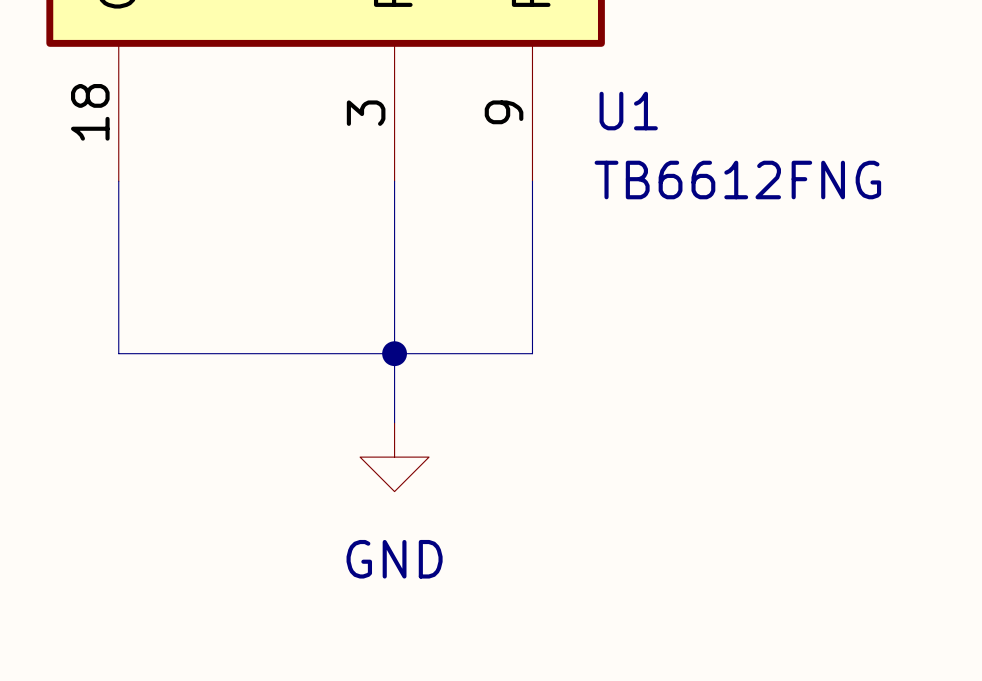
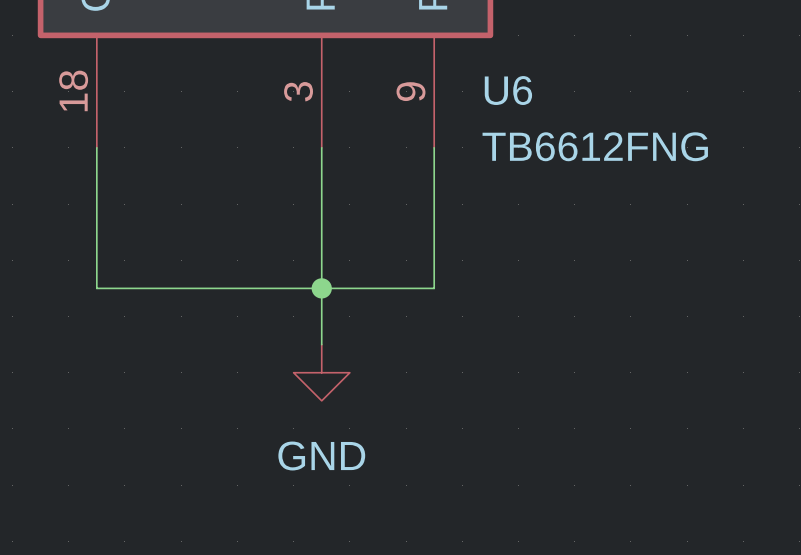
U1 name: U1 (628, 111) -> U6 (508, 90)

